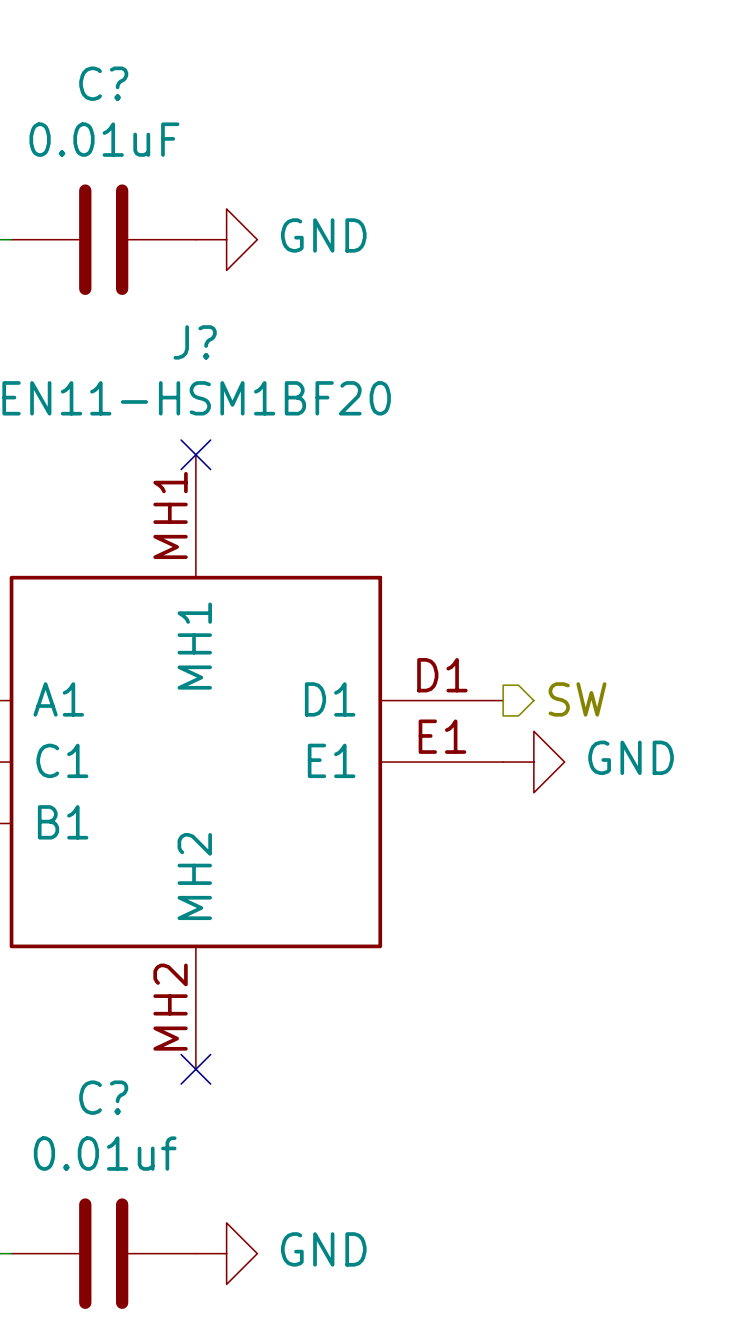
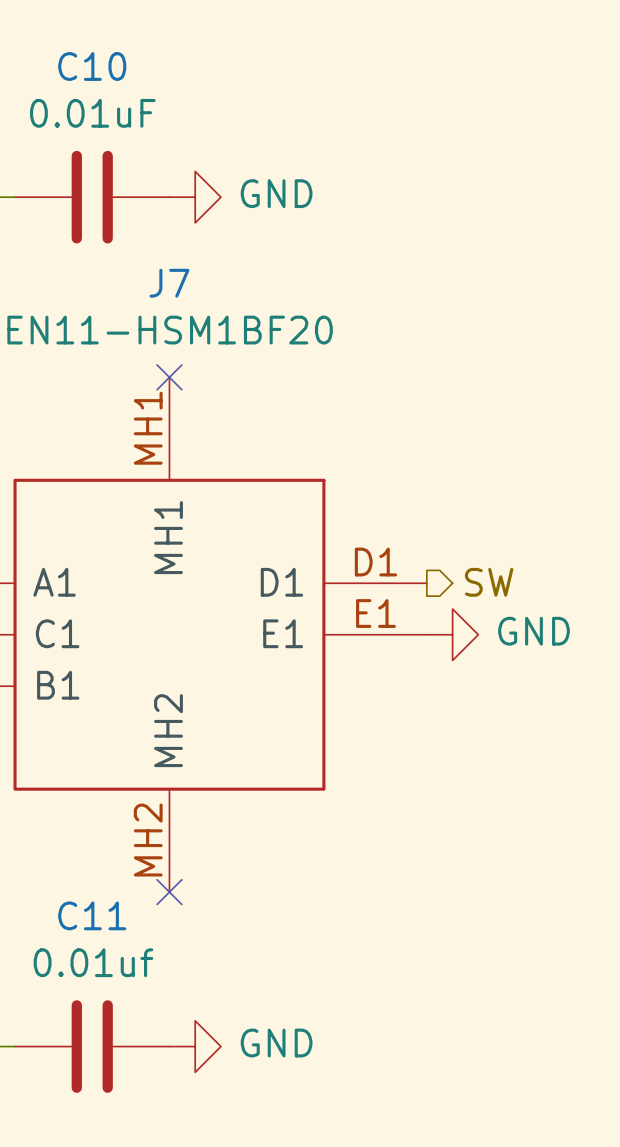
C? name: C? (103, 83) -> C10 (92, 66)
J? name: J? (195, 342) -> J7 (169, 283)
C? name: C? (103, 1097) -> C11 (92, 915)

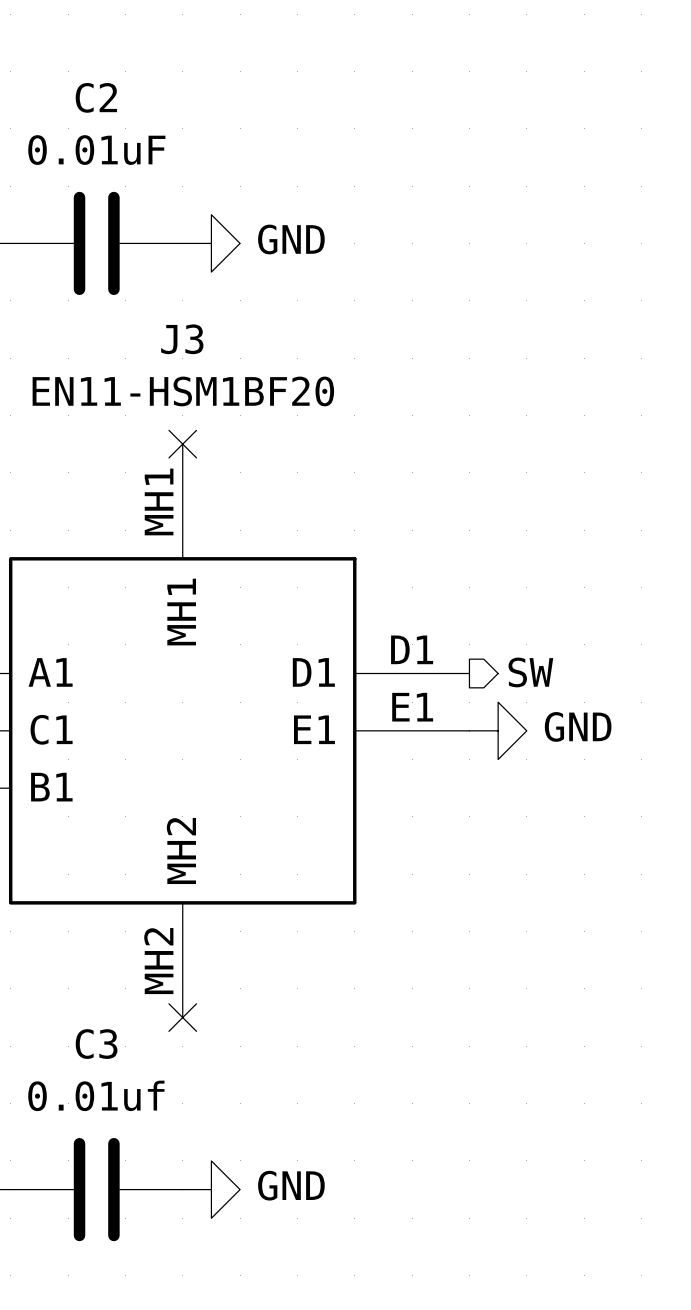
C10 name: C10 (92, 66) -> C2 (96, 97)
J7 name: J7 (169, 283) -> J3 (182, 339)
C11 name: C11 (92, 915) -> C3 (96, 1044)

